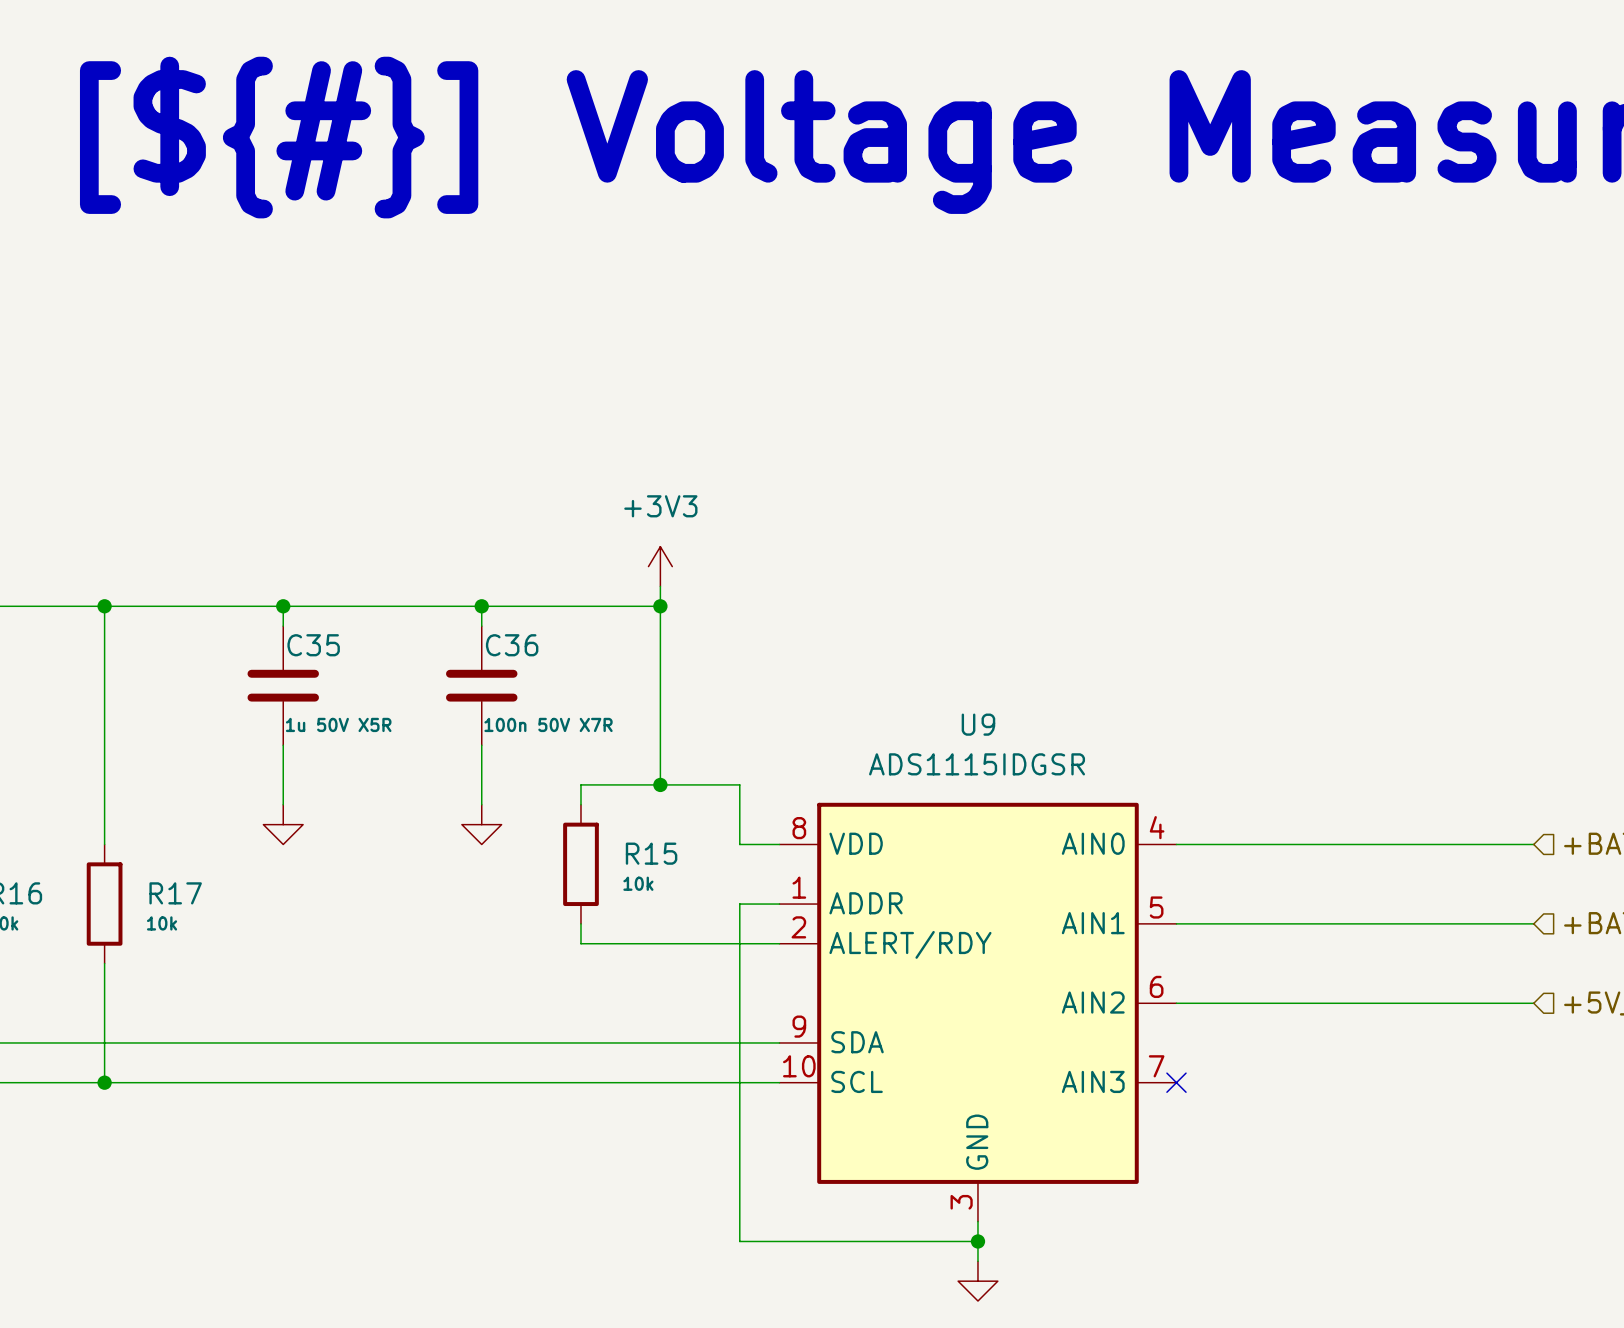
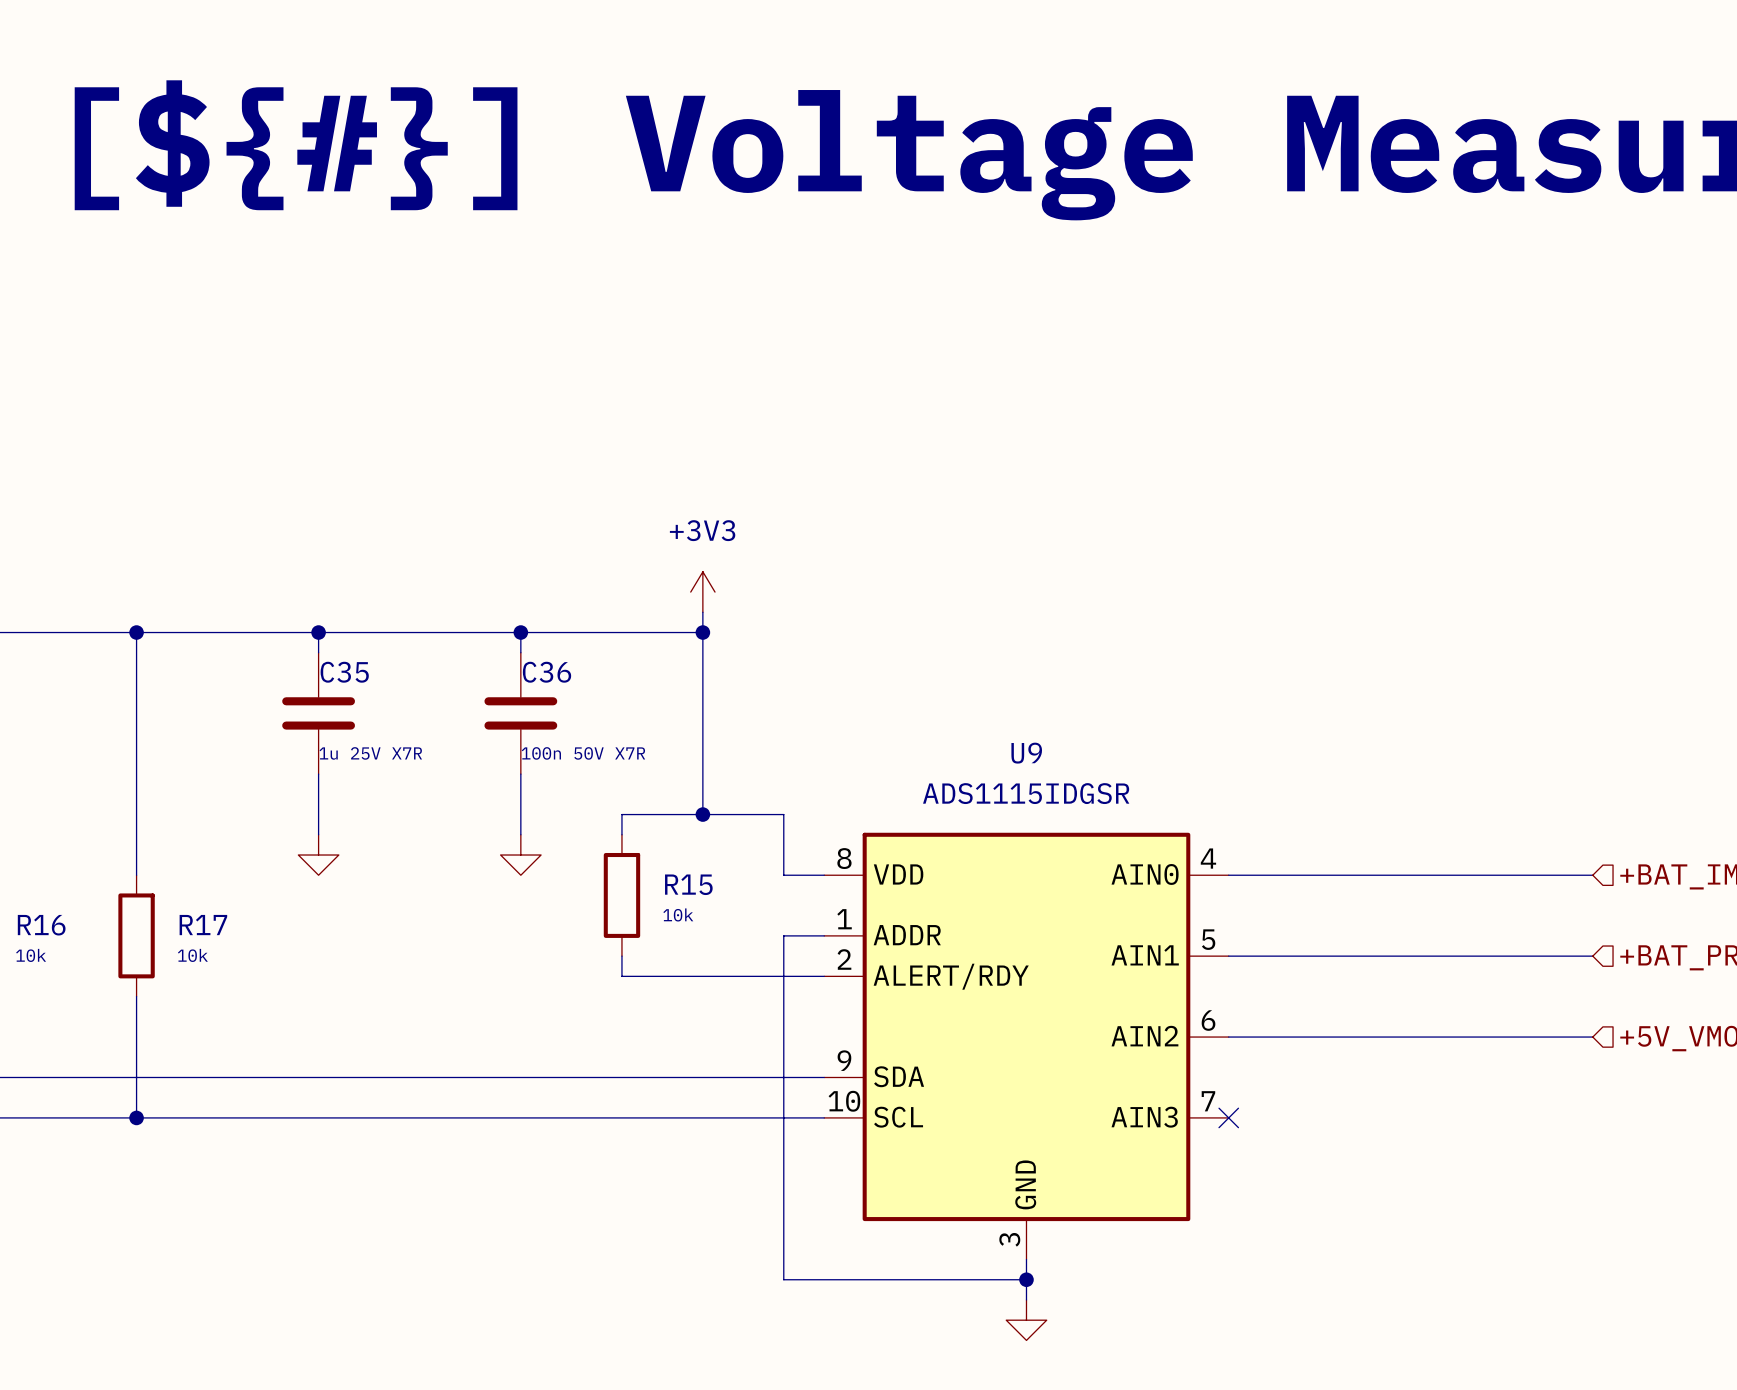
C35 value: 1u 50V X5R (338, 724) -> 1u 25V X7R (370, 753)

